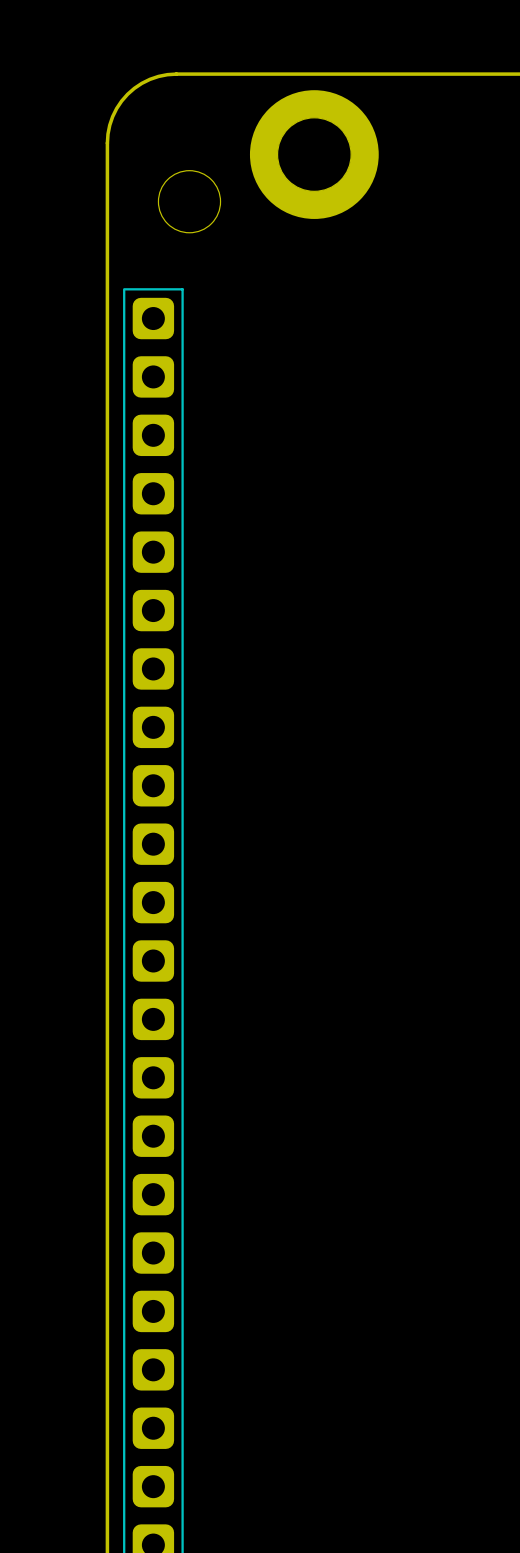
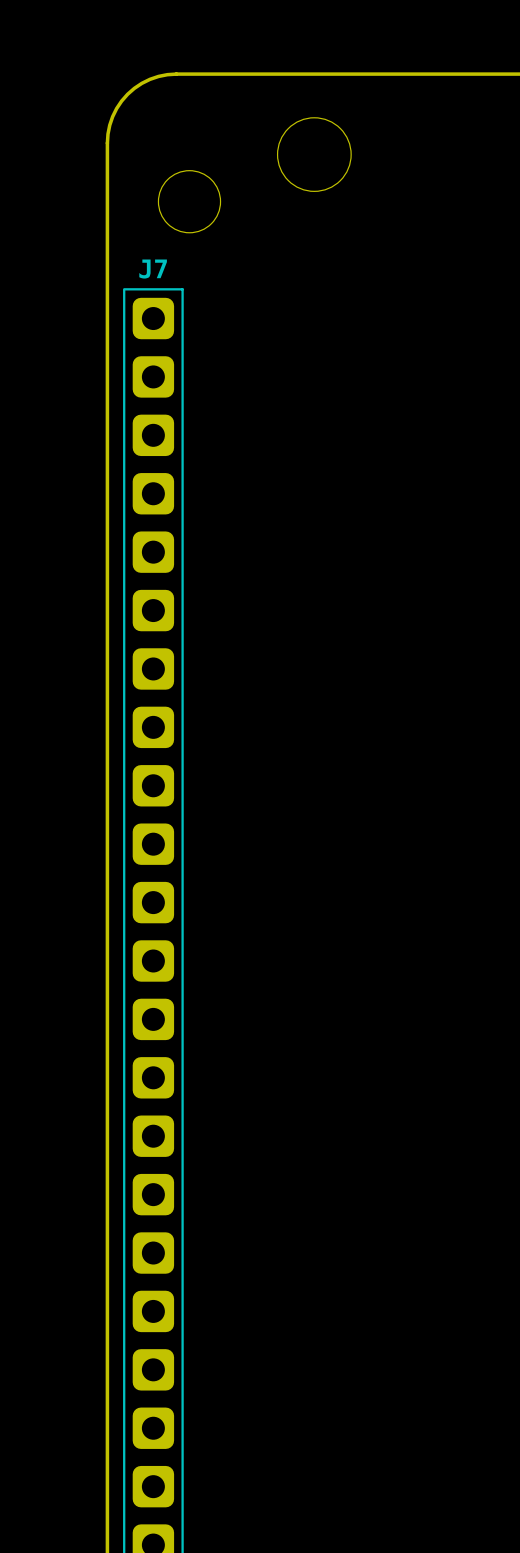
part: (314, 154) -> none
J7 name: none -> J7 (153, 269)

